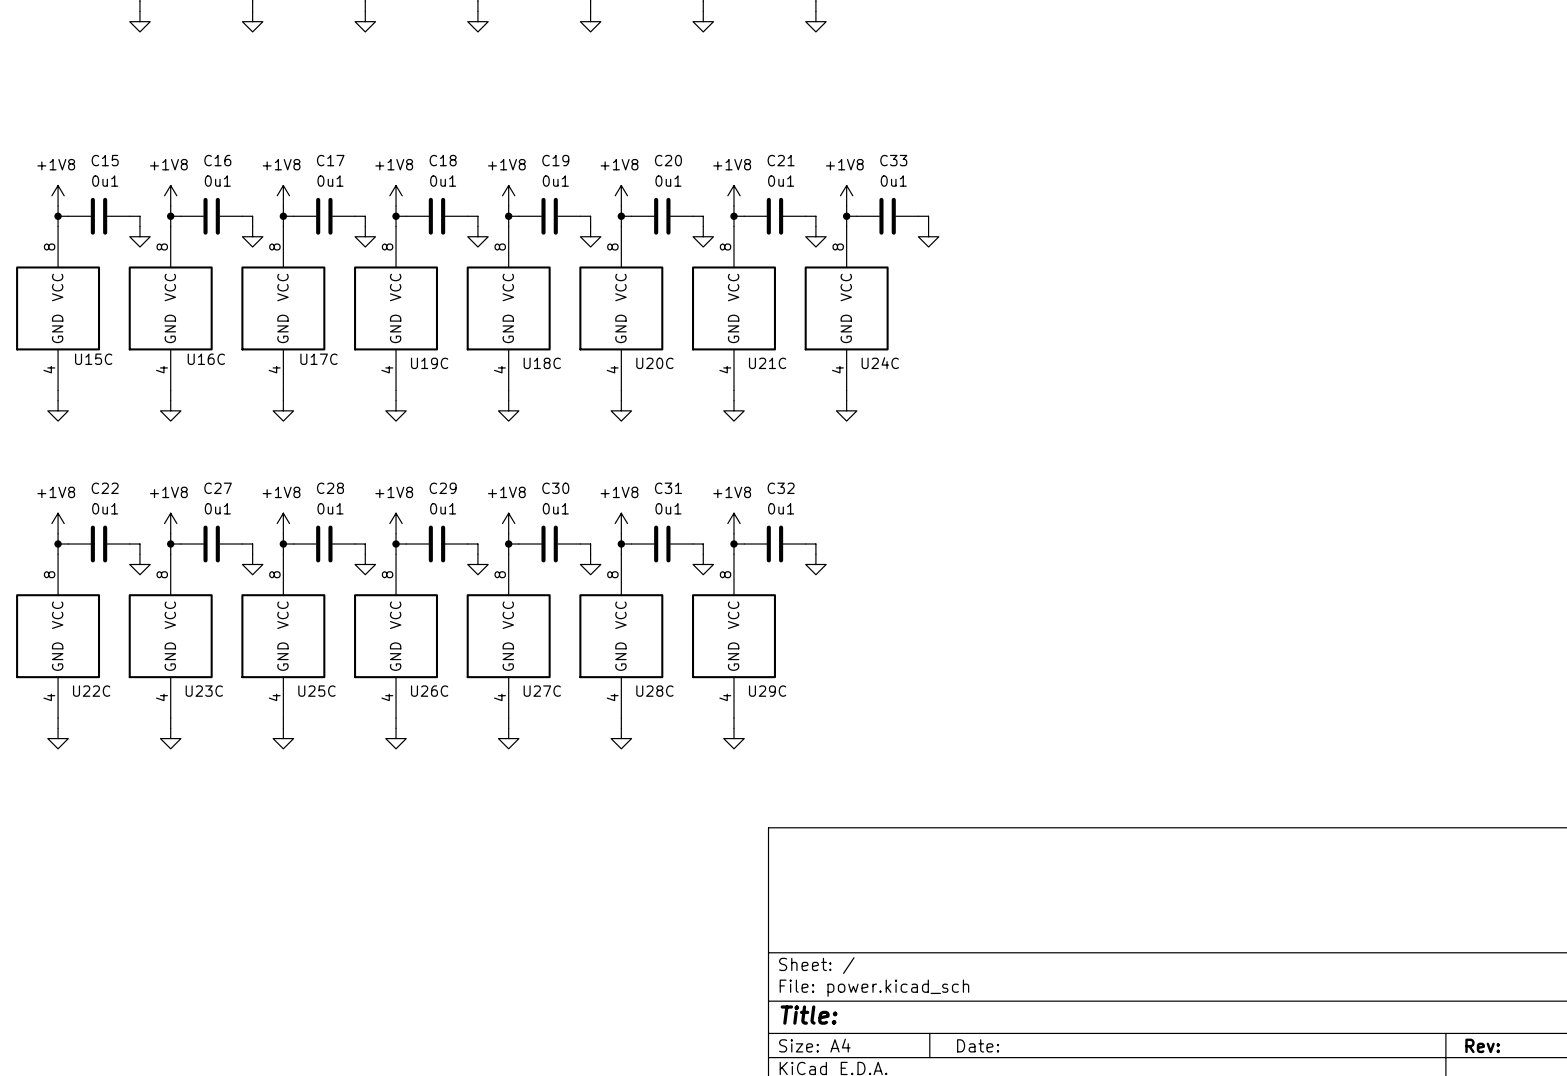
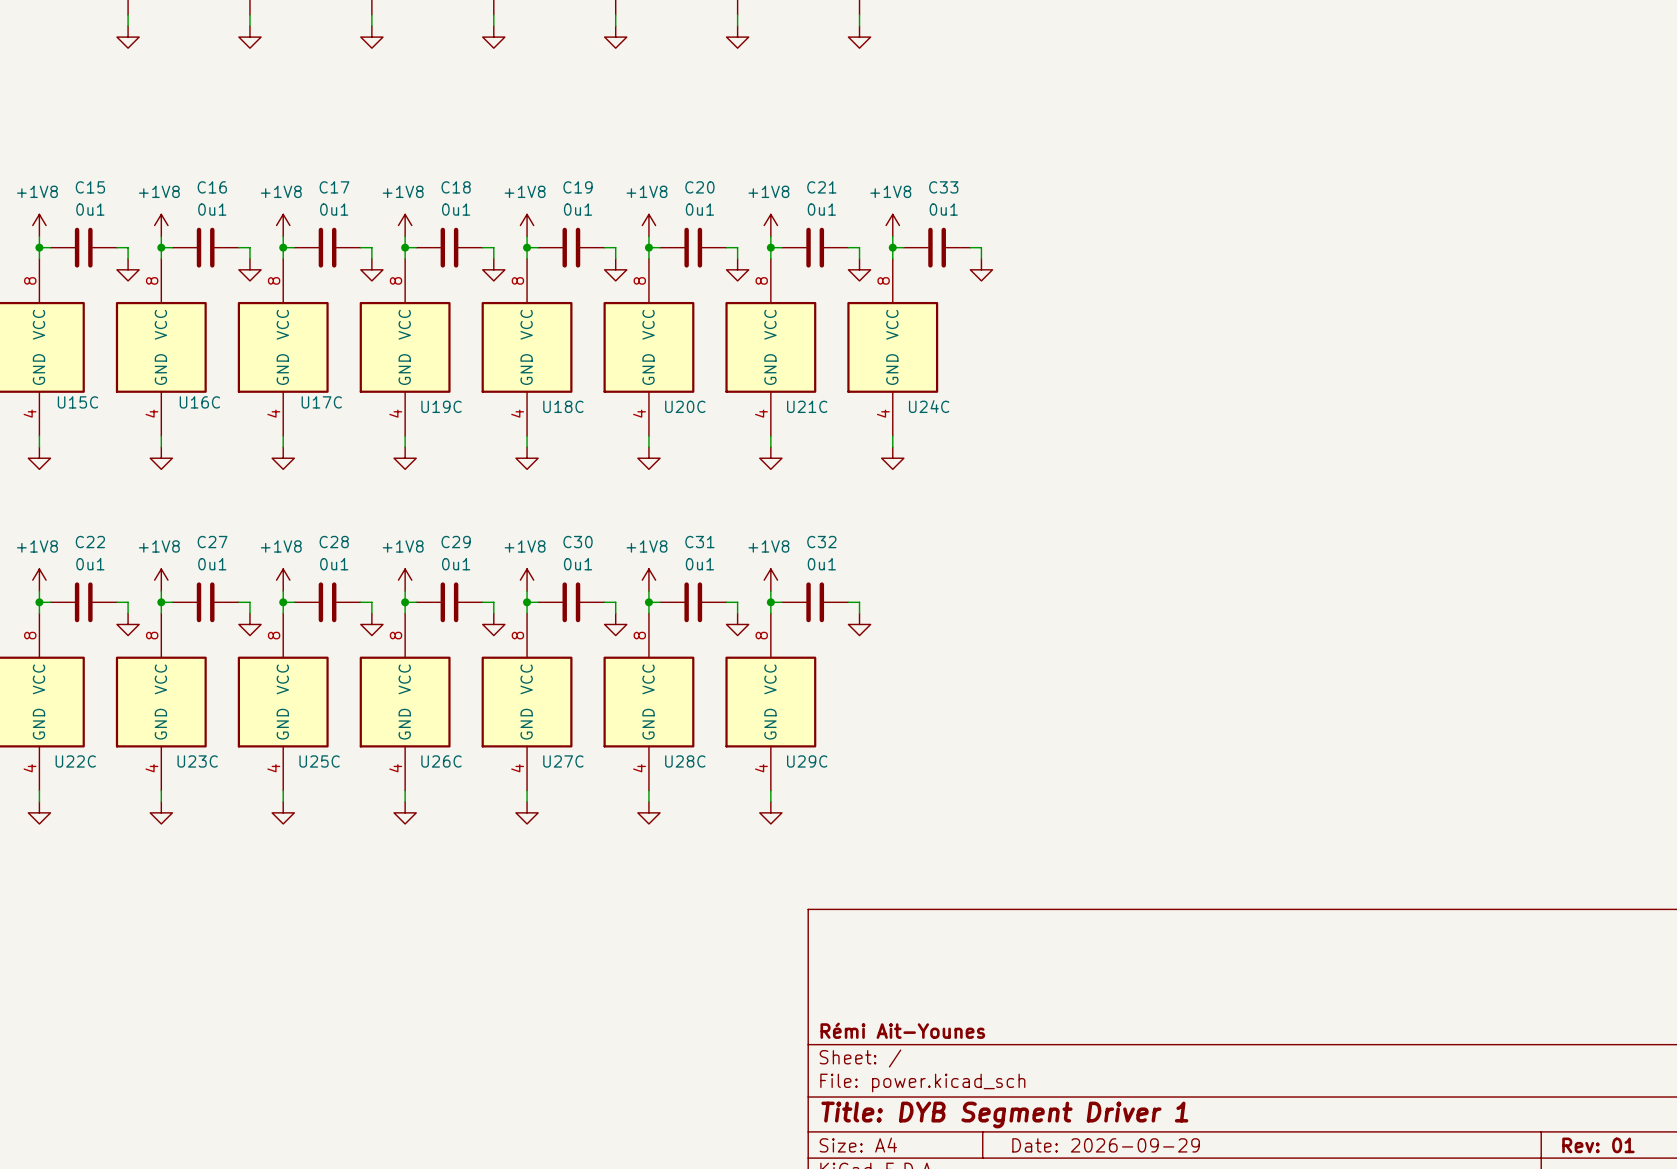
title block: none -> Rémi Ait-Younes (902, 1030)
title block: Title: (809, 1015) -> Title: DYB Segment Driver 1 (1004, 1114)
title block: Date: (978, 1045) -> Date: 2026-09-29 (1106, 1145)
title block: Rev: (1482, 1045) -> Rev: 01 (1598, 1145)

